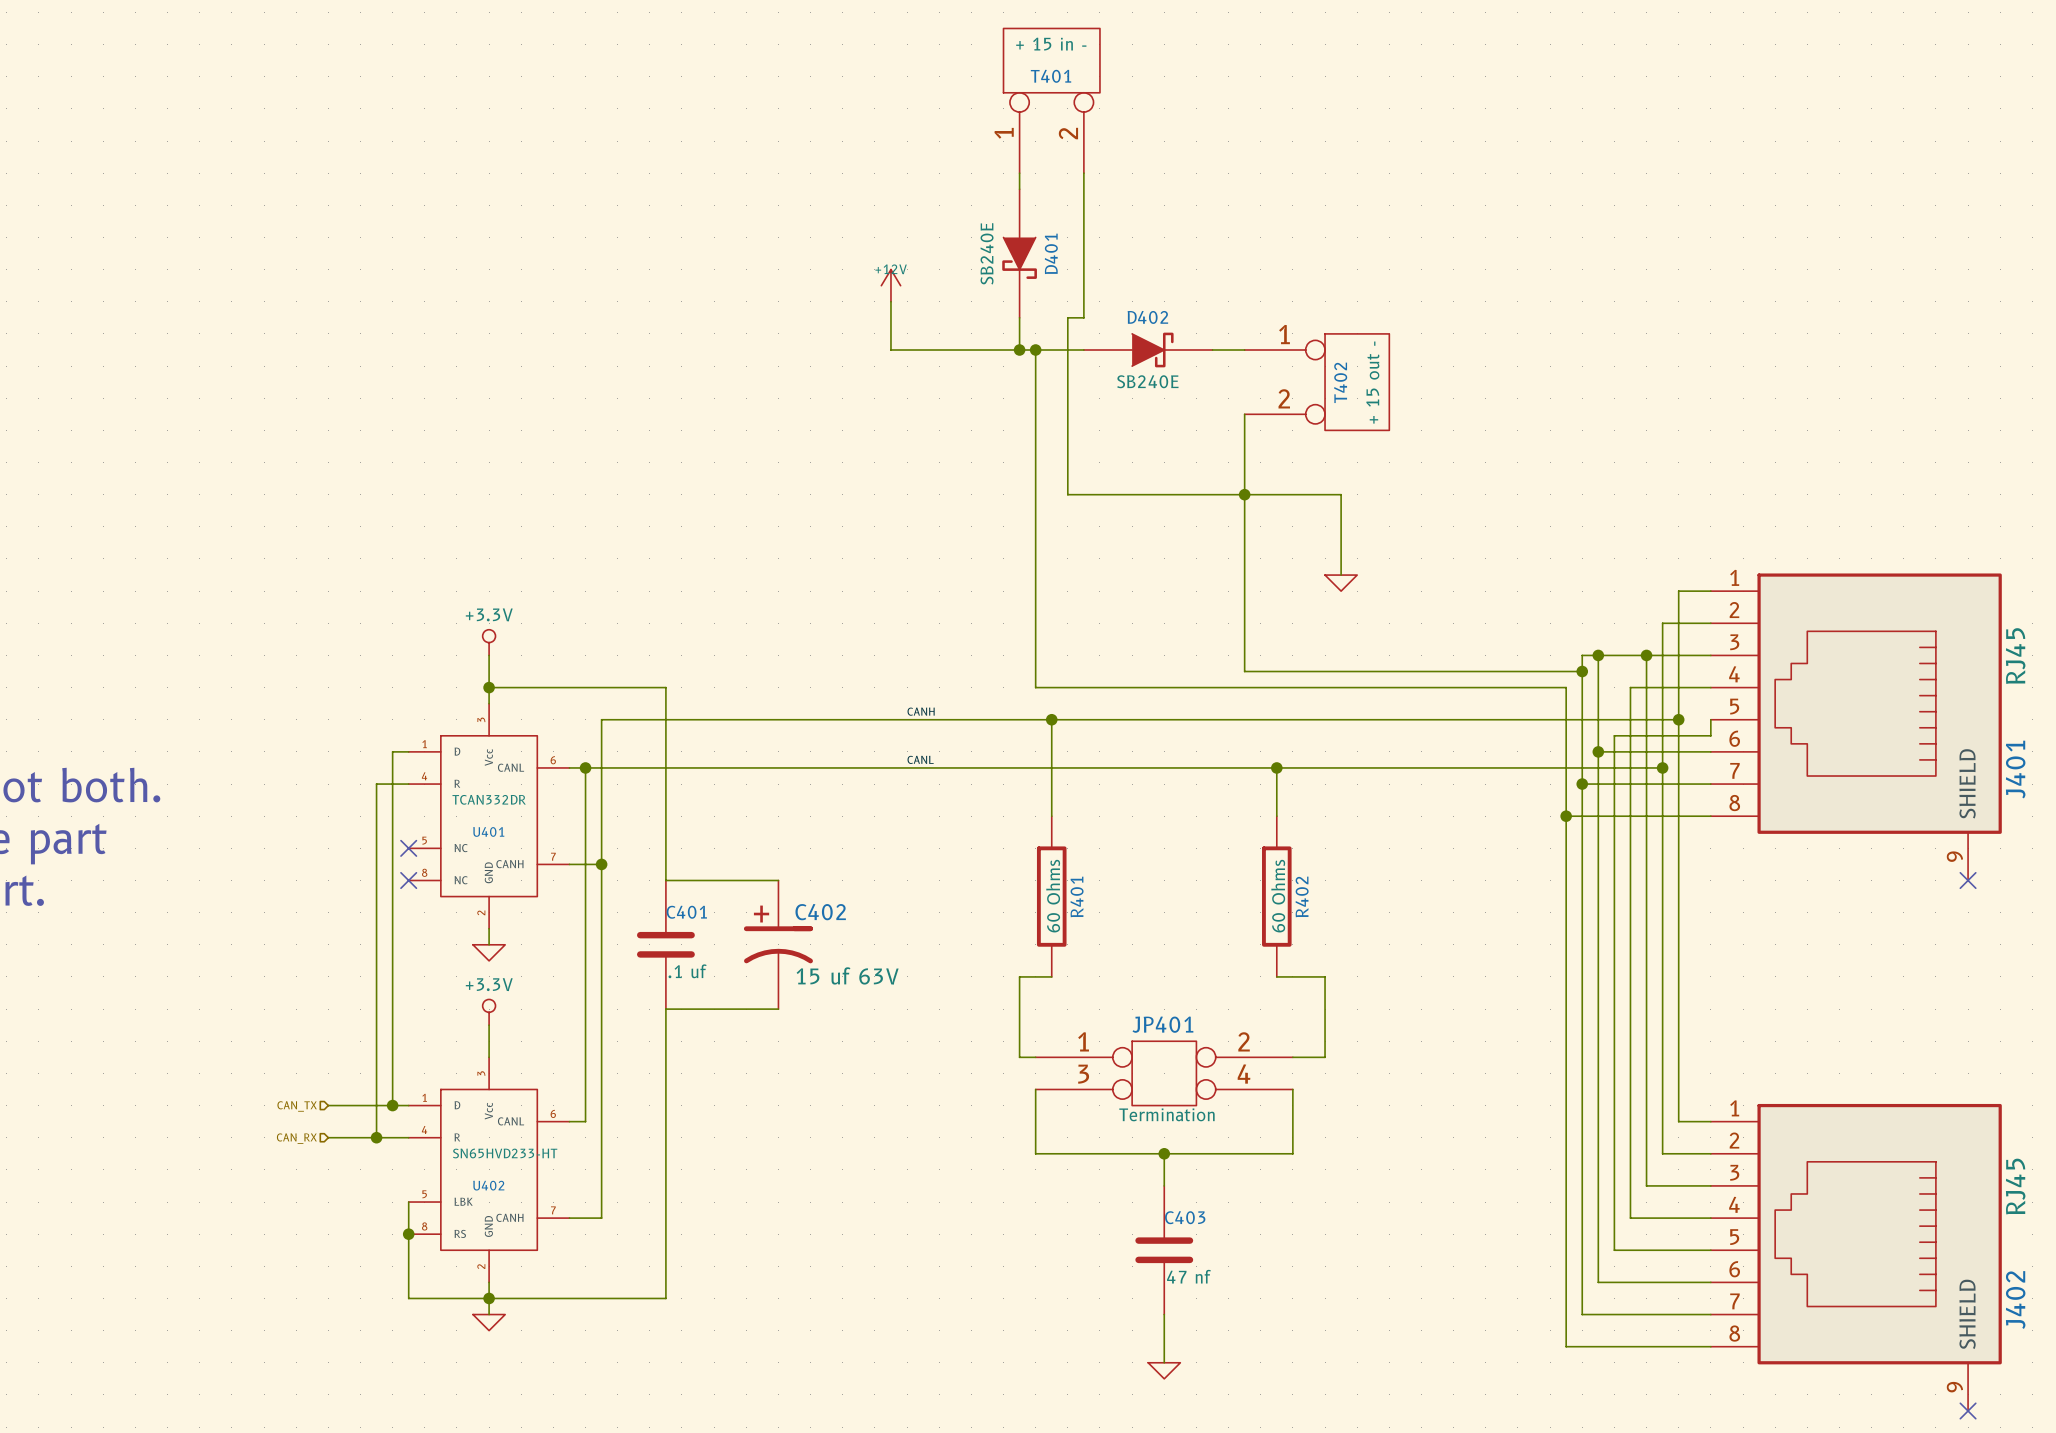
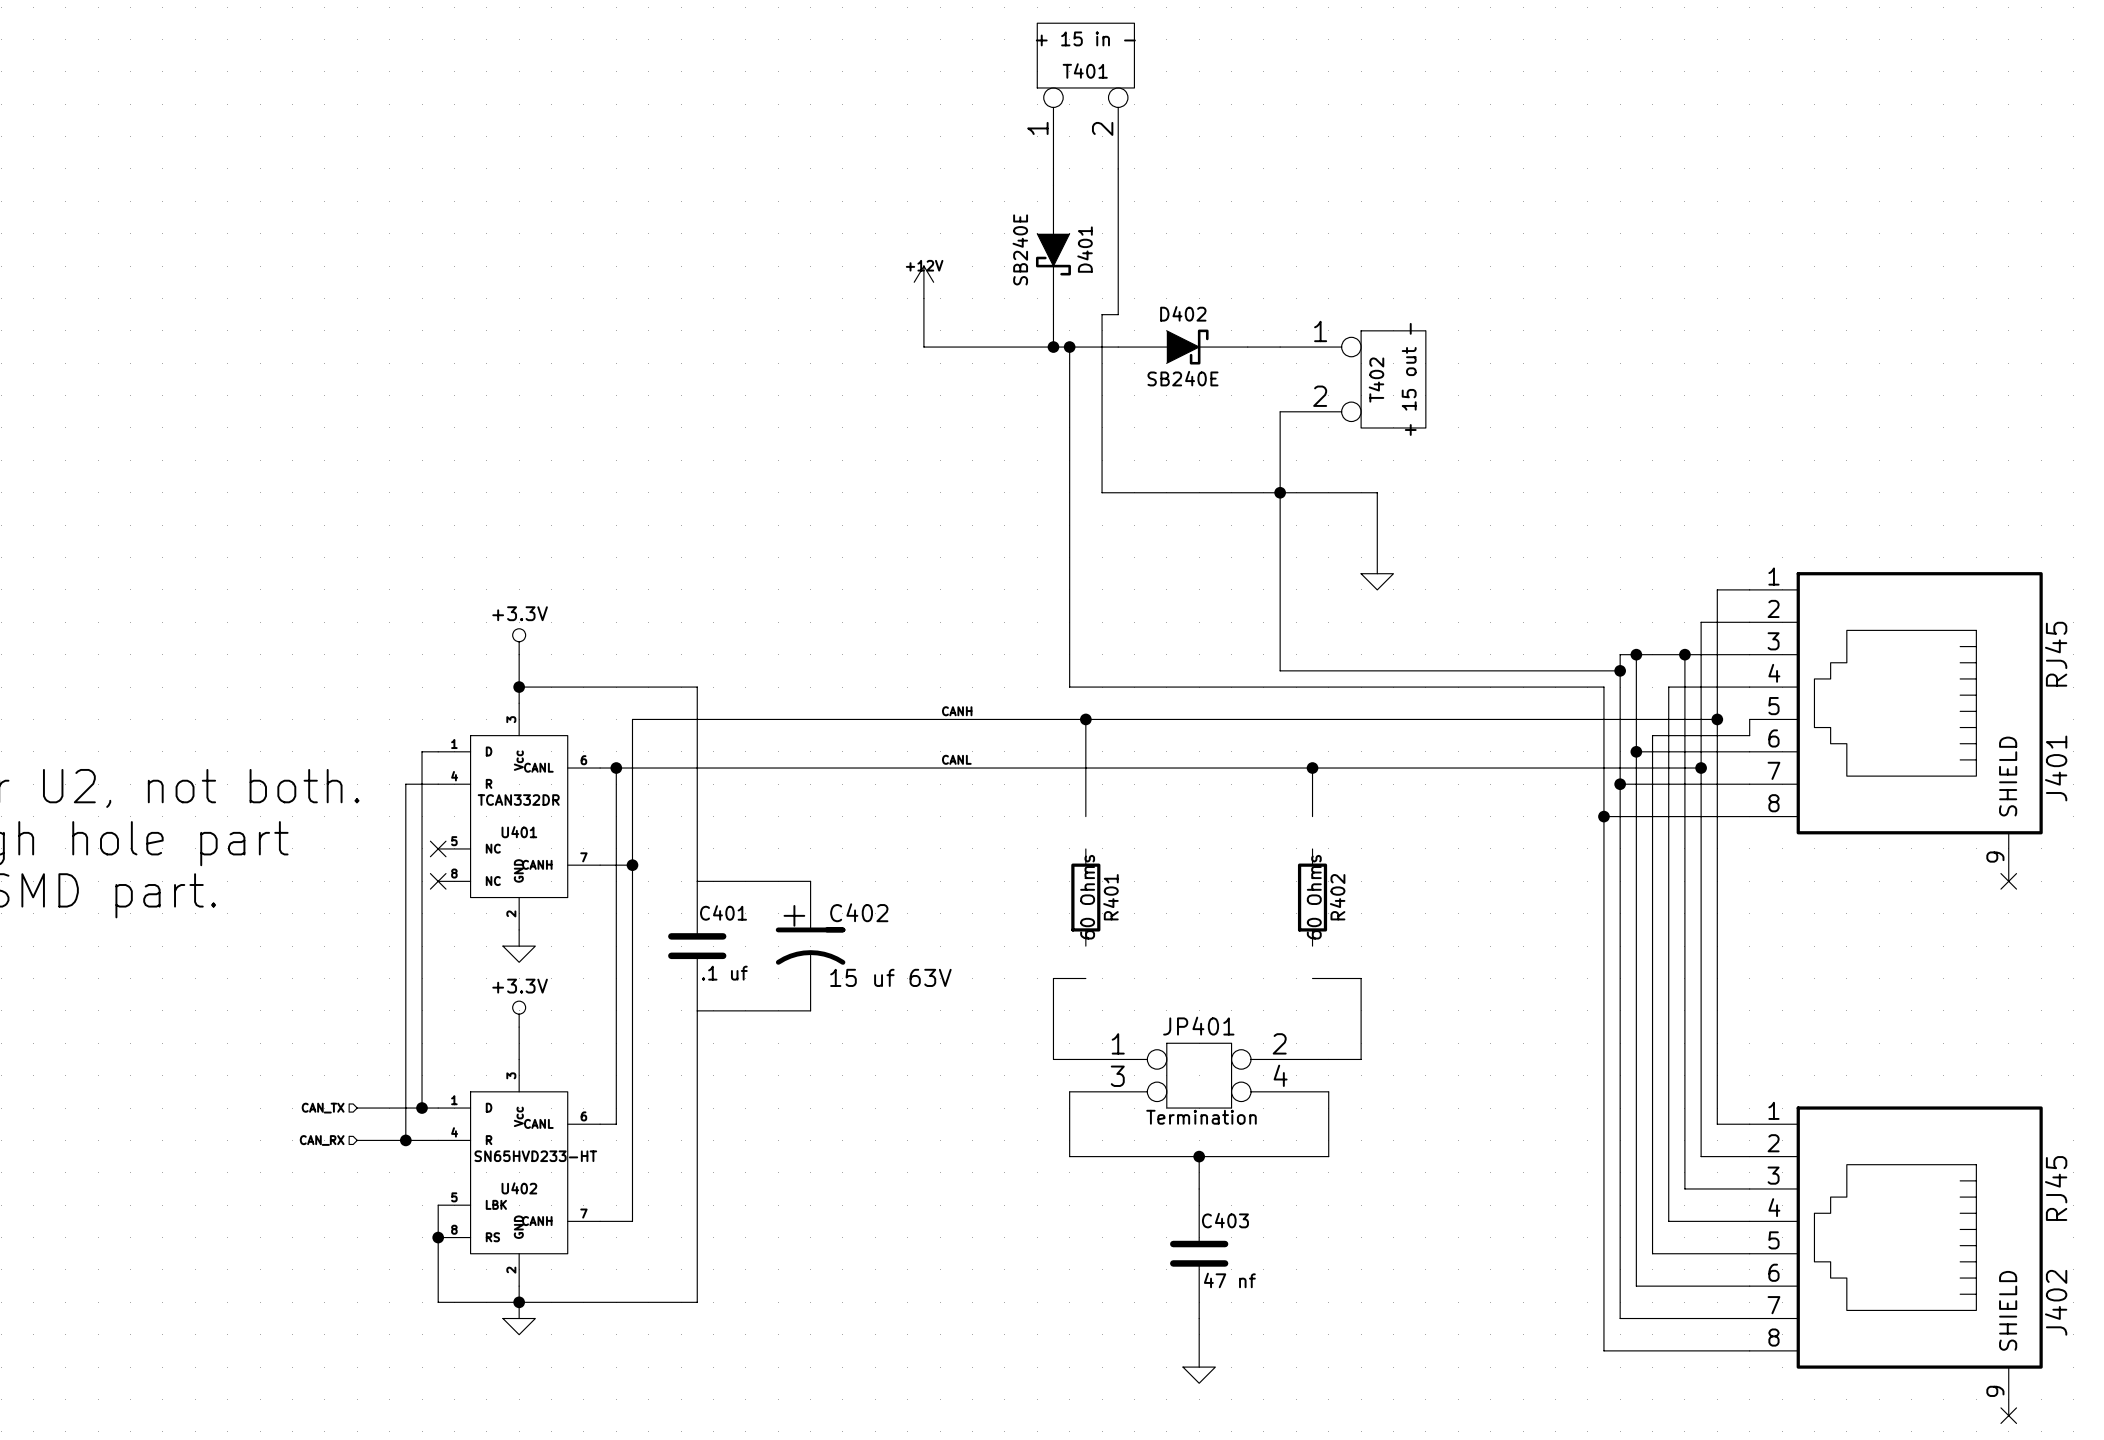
R401 symbol: [1036, 816, 1067, 977] -> [1071, 848, 1101, 947]
R402 symbol: [1262, 816, 1292, 977] -> [1297, 848, 1328, 947]

